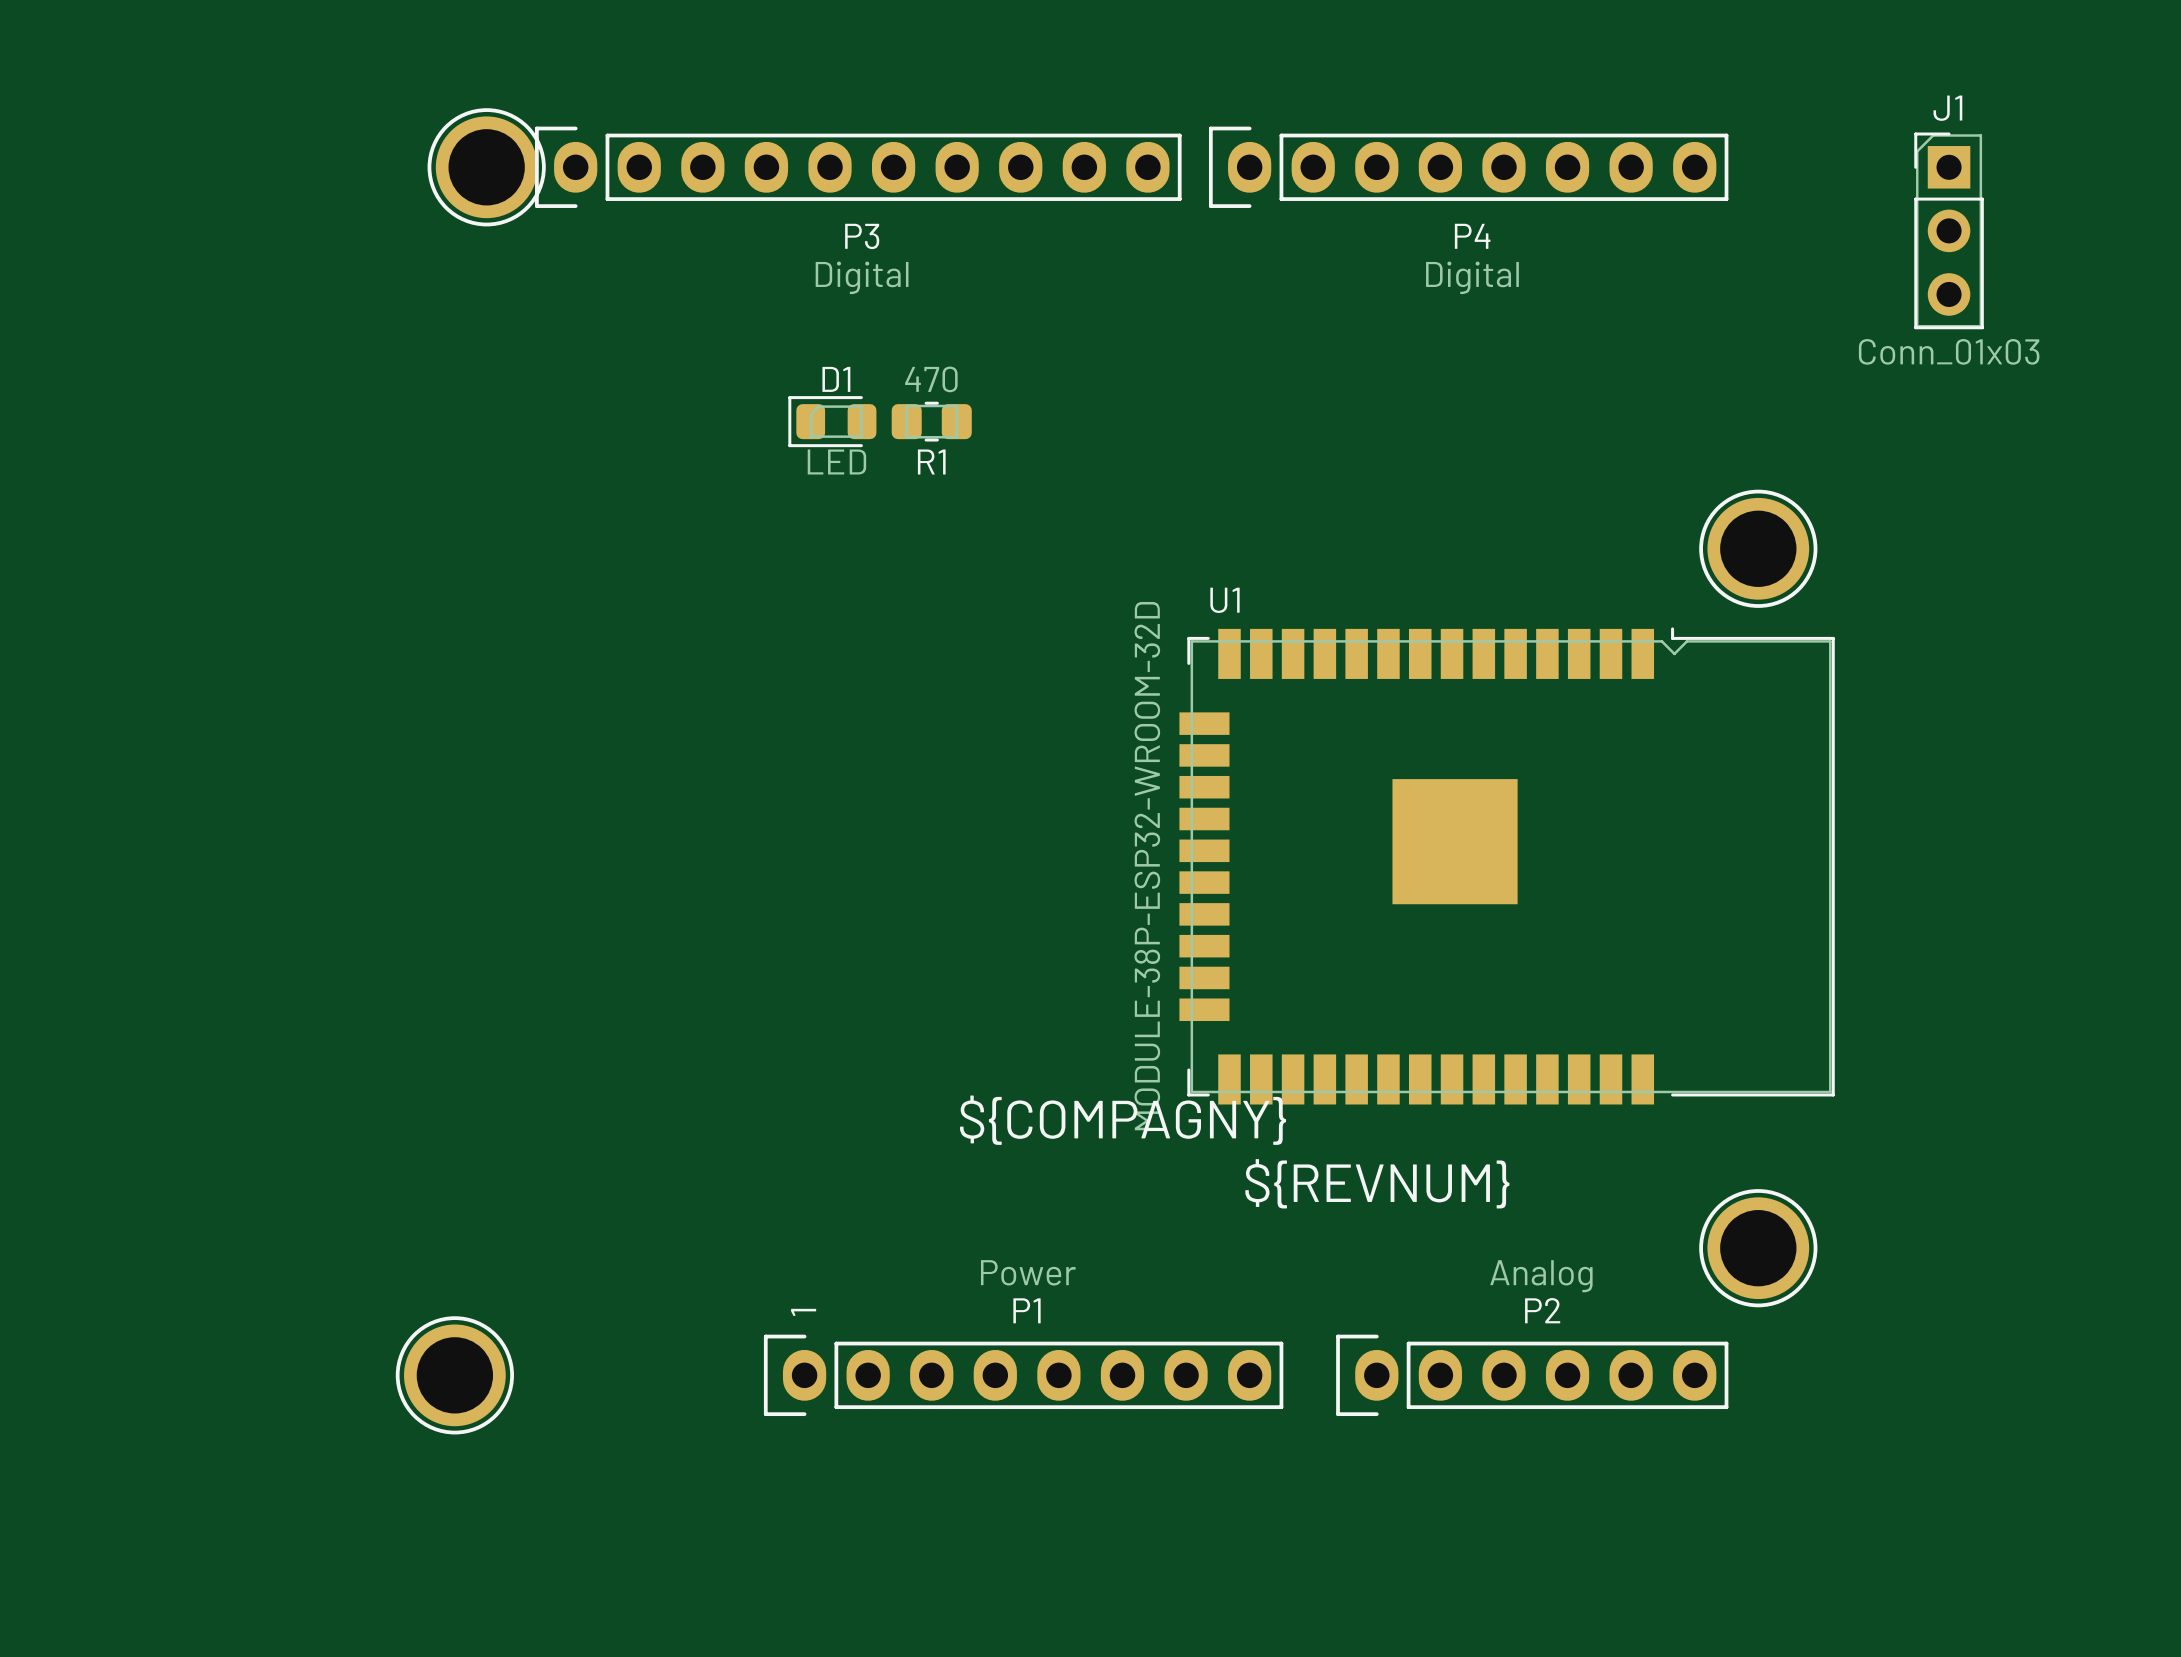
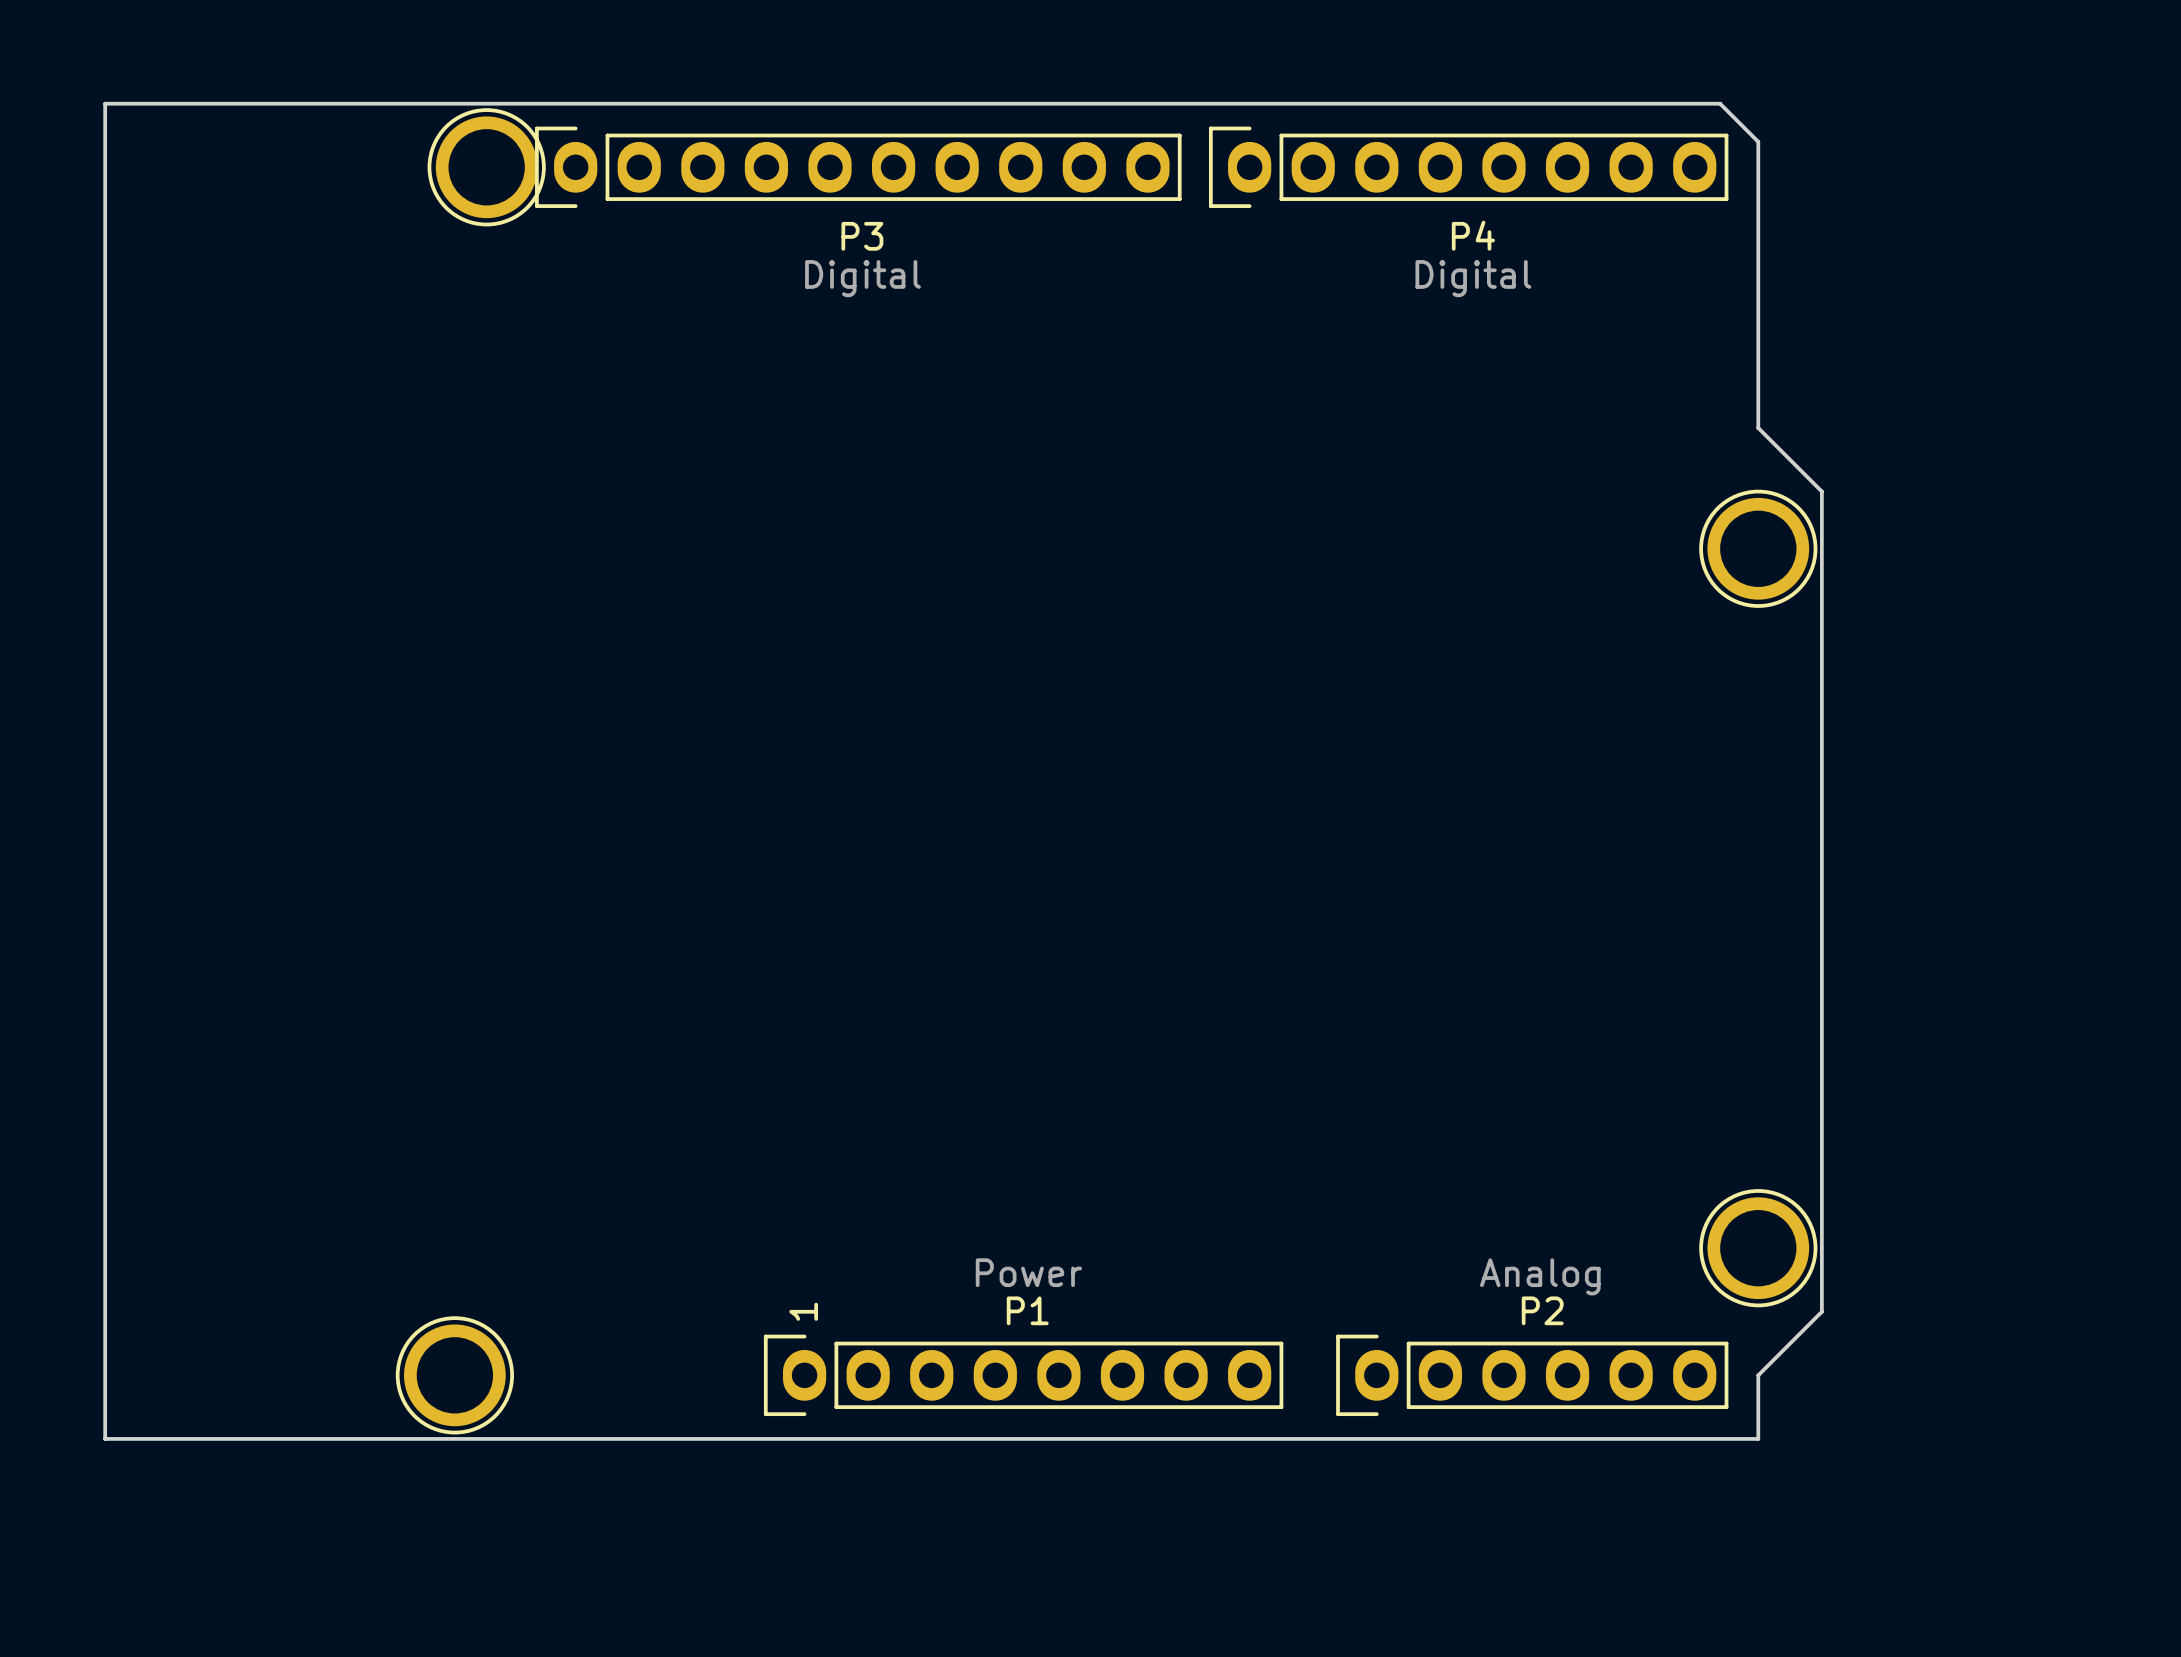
board edge: none -> (105, 103) (105, 1438) (1758, 1438) (1758, 1375) (1821, 1311) (1821, 491) (1758, 427) (1758, 141) (1720, 103) (105, 103)
J1: Conn_01x03 (1949, 230) -> none
D1: LED (832, 421) -> none
R1: 470 (931, 421) -> none
U1: MODULE-38P-ESP32-WROOM-32D (1507, 865) -> none
text: ${COMPAGNY} (1123, 1120) -> none
text: ${REVNUM} (1377, 1183) -> none

